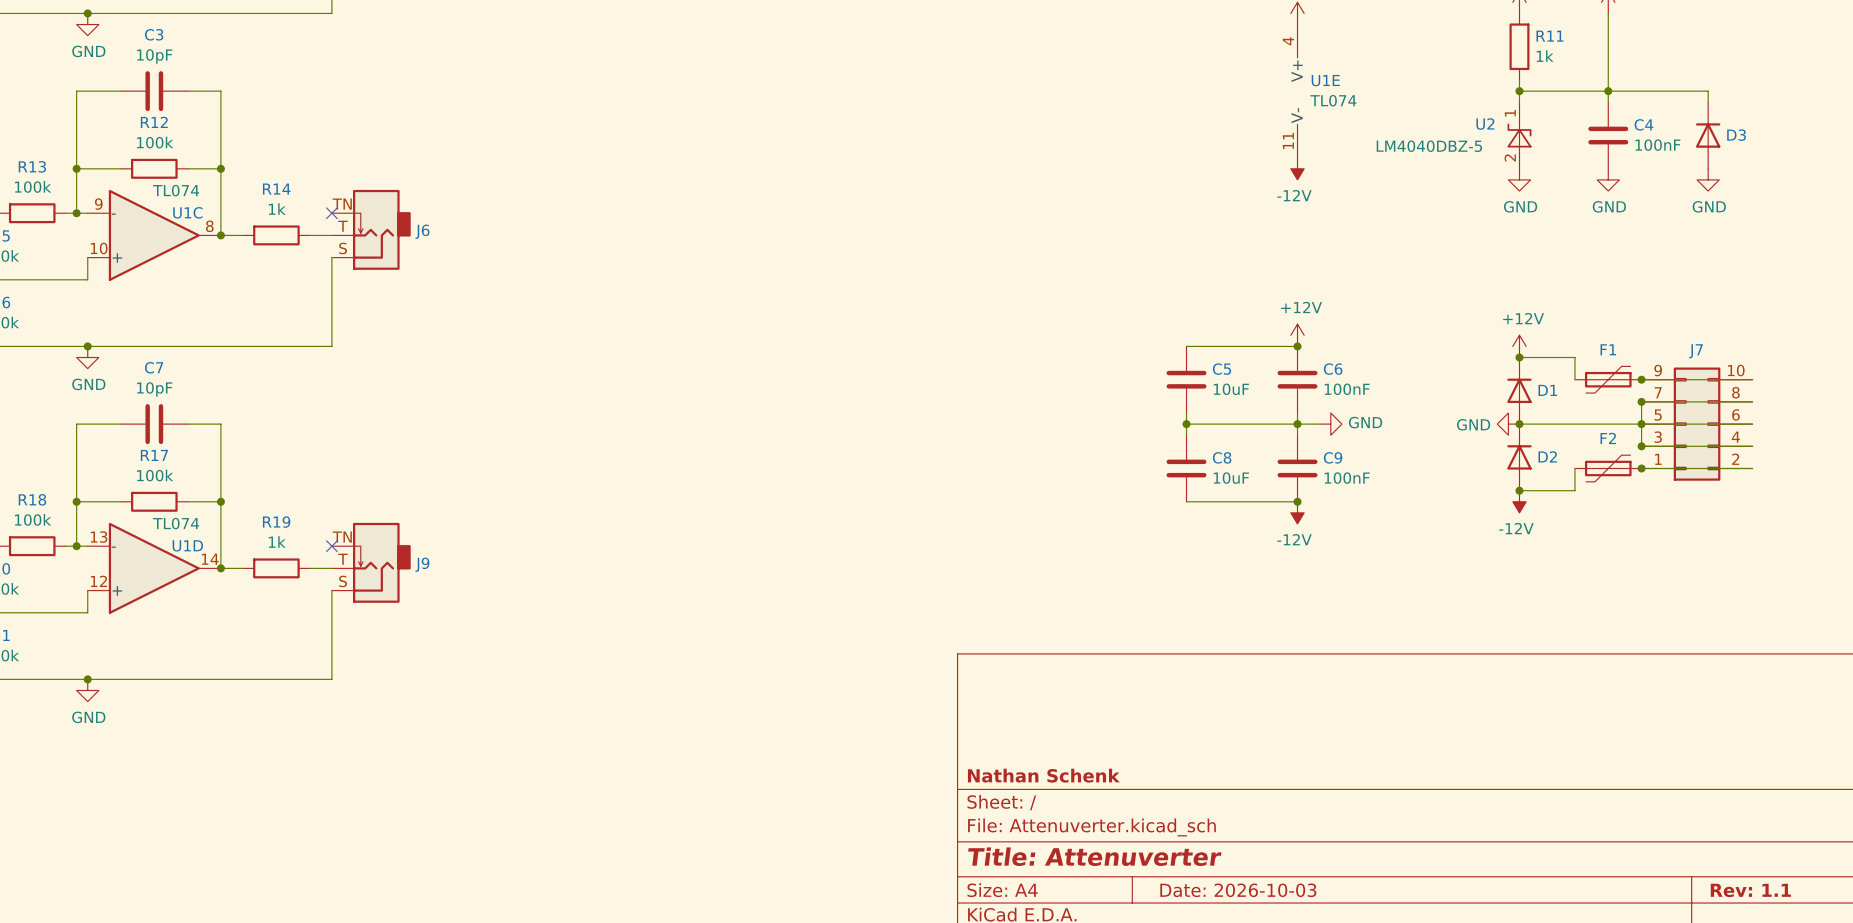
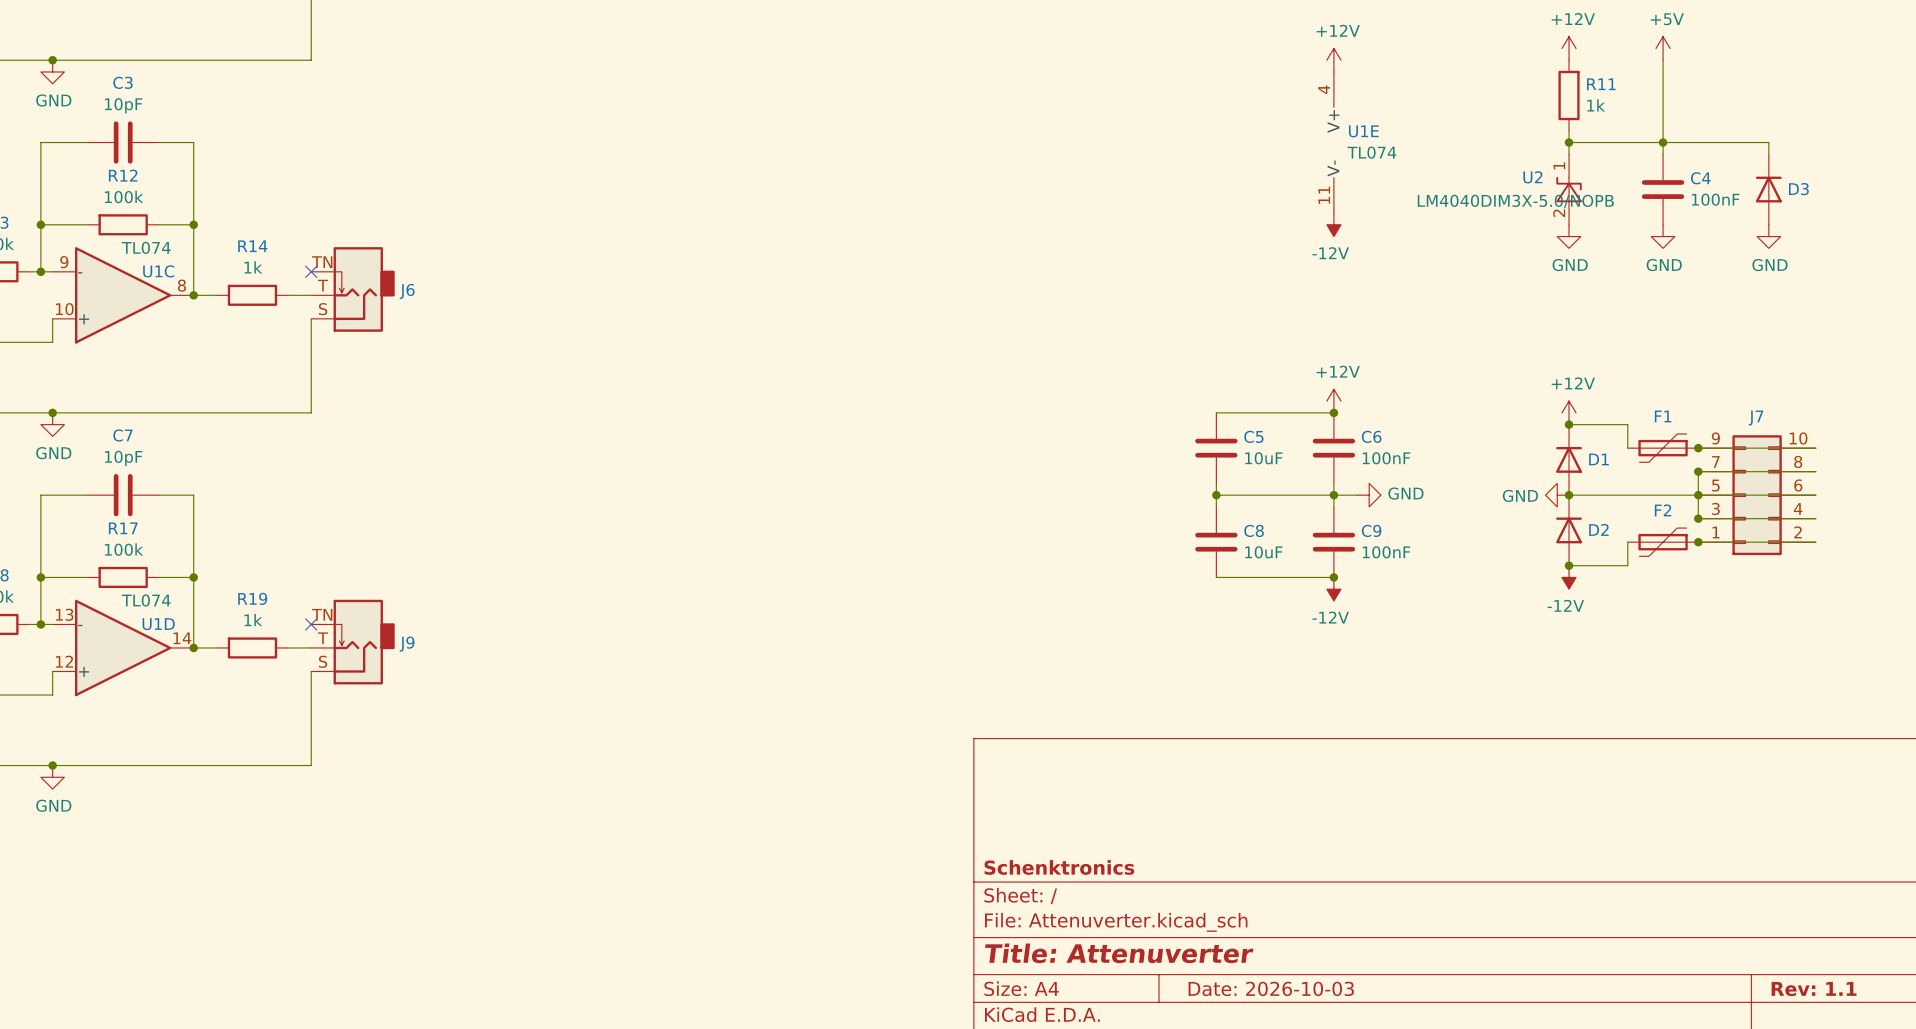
U2 value: LM4040DBZ-5 (1429, 146) -> LM4040DIM3X-5.0/NOPB (1515, 201)
title block: Nathan Schenk (1043, 775) -> Schenktronics (1059, 867)

